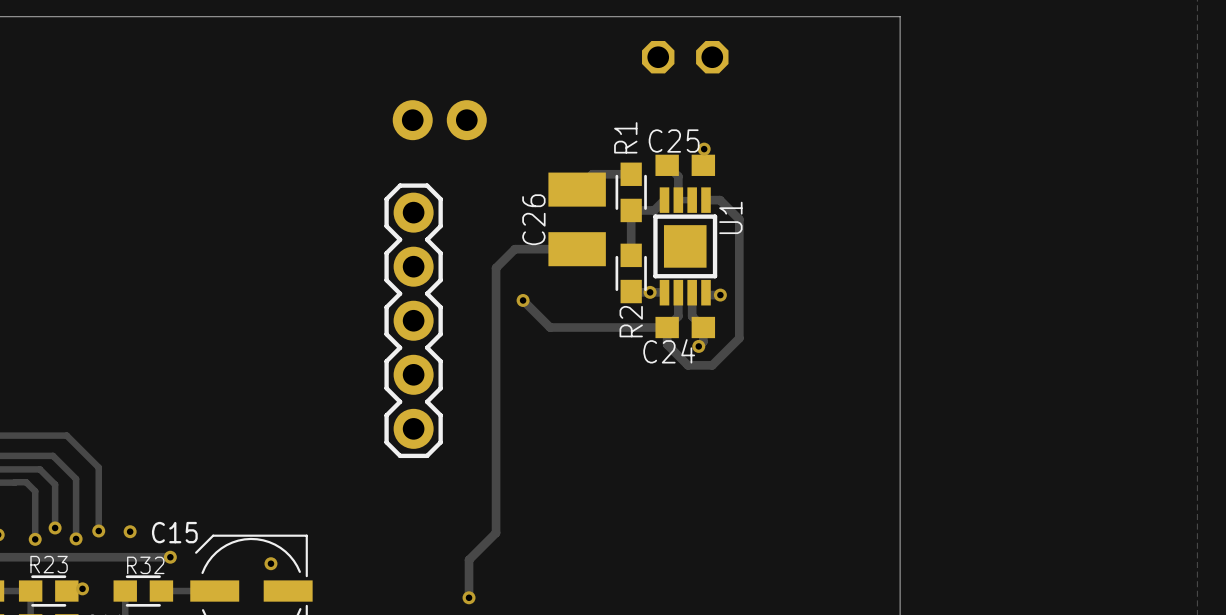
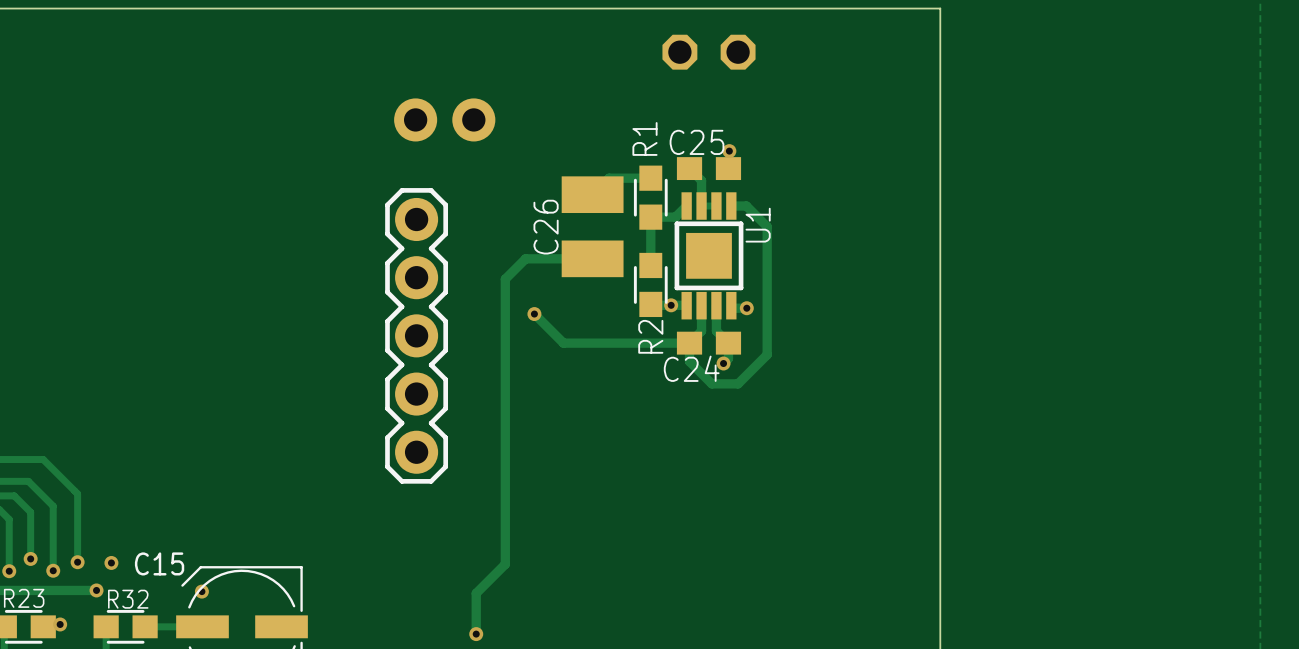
via: none -> (96, 590)
track: (170, 557) (116, 557) -> none
via: (170, 557) -> none
via: none -> (201, 591)
via: (270, 563) -> none

